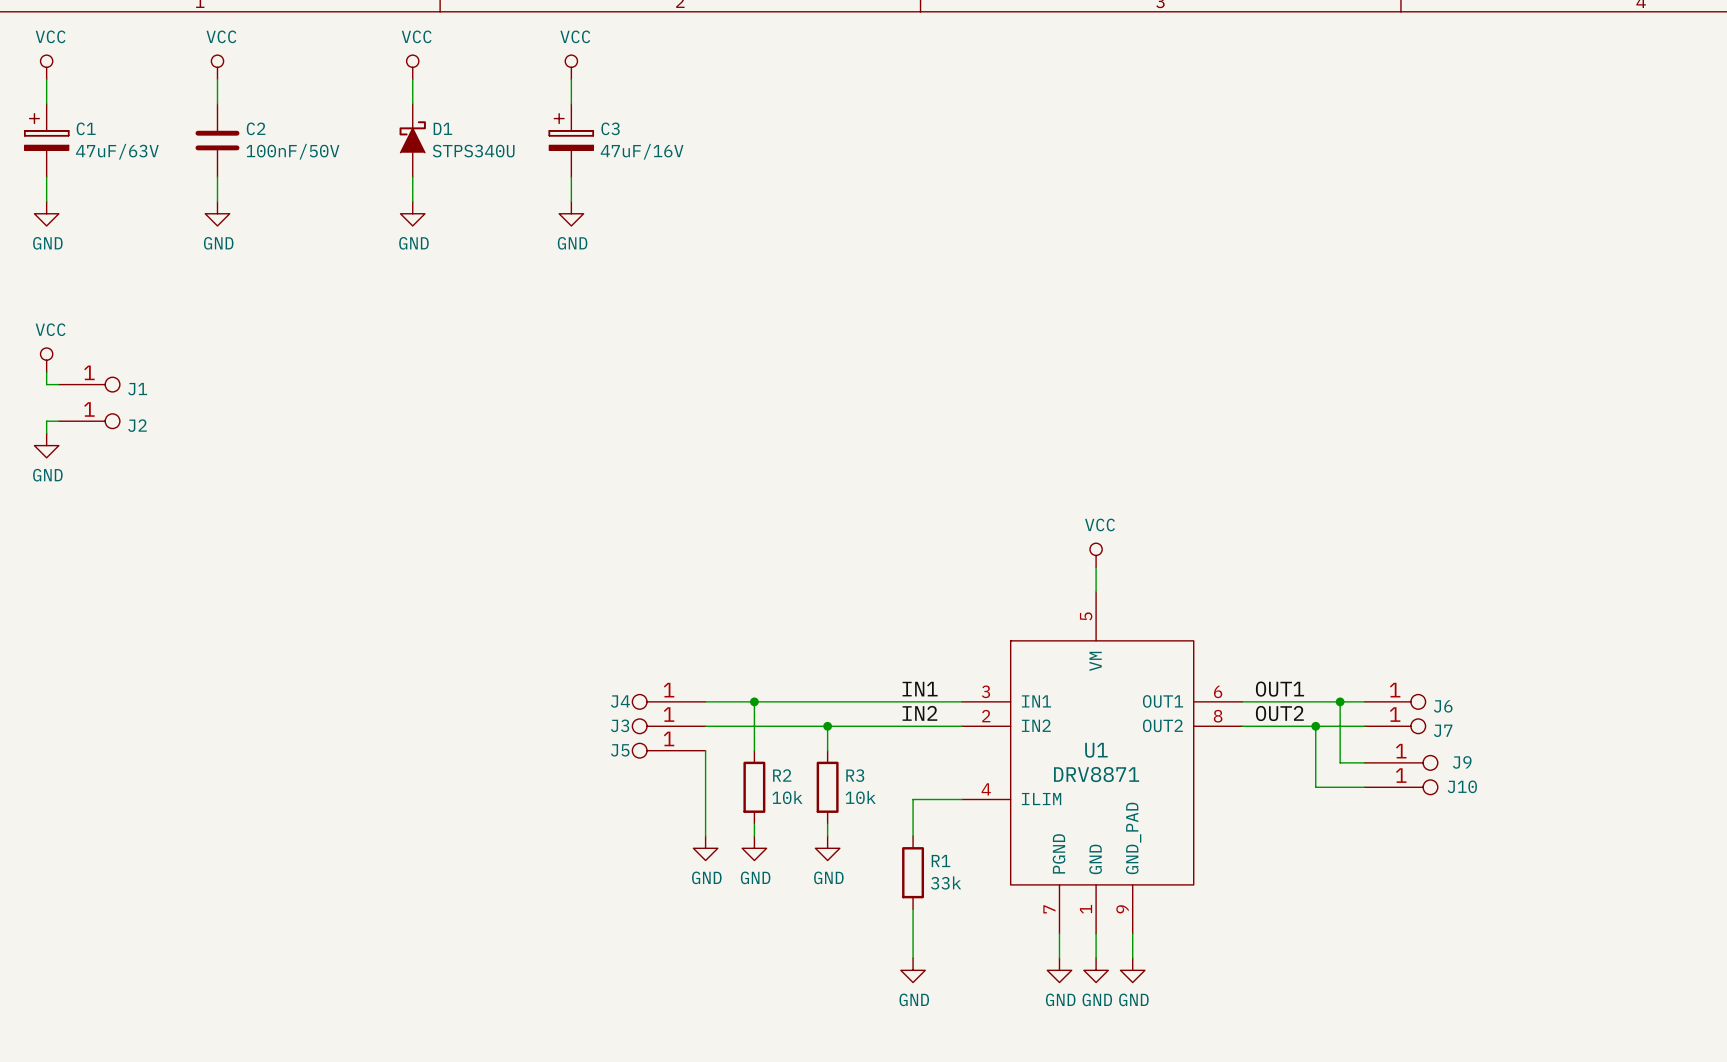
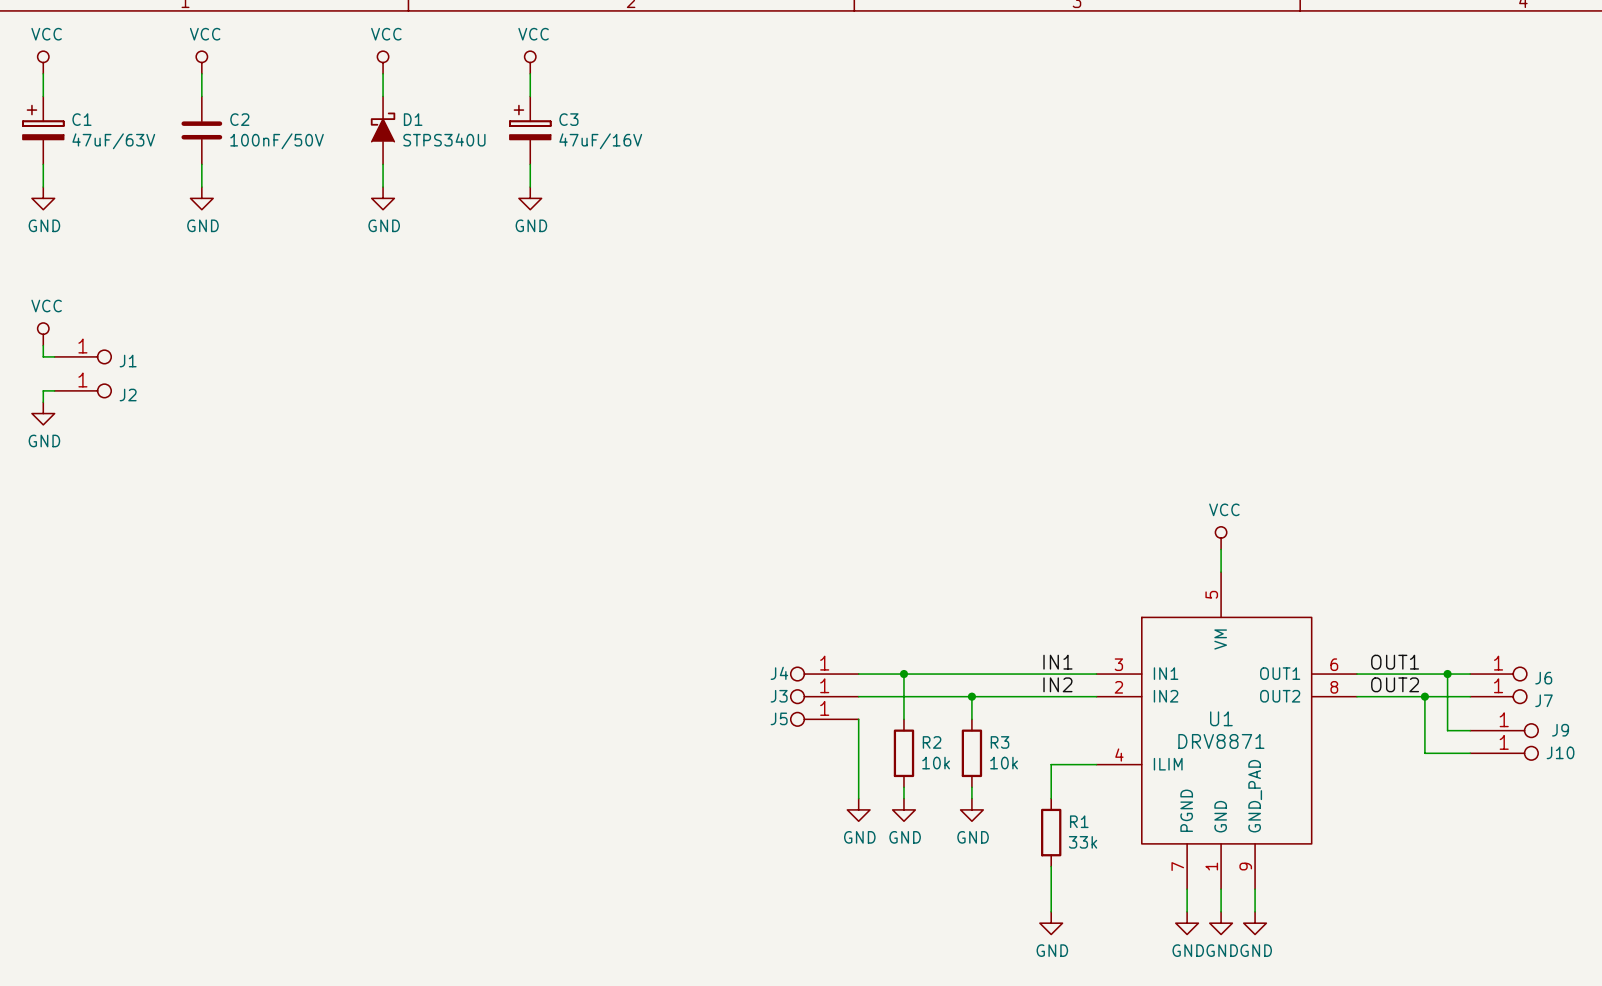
power symbol position: VCC (1096, 555) -> VCC (1221, 538)
wire: (1096, 567) (1096, 592) -> (1221, 549) (1221, 572)
label position: IN1 (920, 689) -> IN1 (1057, 662)
label position: OUT1 (1279, 689) -> OUT1 (1395, 662)
J3 position: (668, 701) -> (824, 674)
wire: (705, 701) (961, 701) -> (858, 696) (1096, 696)
wire: (754, 701) (754, 750) -> (903, 674) (903, 719)
junction: (754, 701) -> none
wire: (1242, 701) (1364, 701) -> (1356, 674) (1470, 674)
wire: (1340, 701) (1340, 762) (1364, 762) -> (1447, 674) (1447, 730) (1470, 730)
junction: (1340, 701) -> none
J6 position: (1395, 701) -> (1498, 674)
label position: IN2 (919, 713) -> IN2 (1057, 684)
label position: OUT2 (1279, 713) -> OUT2 (1395, 684)
J4 position: (668, 726) -> (824, 696)
wire: (705, 726) (925, 726) -> none
wire: (827, 726) (827, 750) -> (971, 696) (971, 719)
junction: (827, 726) -> none
wire: none -> (892, 674) (1096, 674)
junction: none -> (903, 674)
wire: (1242, 726) (1364, 726) -> (1356, 696) (1470, 696)
wire: (1315, 726) (1315, 787) (1364, 787) -> (1424, 696) (1424, 753) (1470, 753)
junction: (1315, 726) -> none
J7 position: (1395, 726) -> (1498, 696)
junction: none -> (1447, 674)
J5 position: (668, 750) -> (824, 719)
wire: (705, 750) (705, 836) -> (858, 719) (858, 798)
junction: none -> (971, 696)
junction: none -> (1424, 696)
U1 position: (1102, 762) -> (1226, 730)
J9 position: (1401, 762) -> (1504, 730)
R2 position: (754, 787) -> (903, 753)
R3 position: (827, 787) -> (971, 753)
J10 position: (1401, 787) -> (1504, 753)
wire: (961, 799) (913, 799) (913, 836) -> (1096, 764) (1051, 764) (1051, 798)
wire: (754, 823) (754, 836) -> (903, 787) (903, 798)
wire: (827, 823) (827, 836) -> (971, 787) (971, 798)
power symbol: GND (705, 848) -> none
power symbol: GND (754, 848) -> none
power symbol: GND (827, 848) -> none
R1 position: (913, 872) -> (1051, 832)
power symbol: none -> GND (858, 809)
power symbol: none -> GND (903, 809)
power symbol: none -> GND (971, 809)
wire: (913, 909) (913, 958) -> none
wire: (1059, 933) (1059, 958) -> (1187, 889) (1187, 911)
wire: (1096, 933) (1096, 958) -> (1221, 889) (1221, 911)
wire: none -> (1255, 889) (1255, 911)
power symbol: GND (913, 970) -> none
power symbol: GND (1059, 970) -> none
power symbol: GND (1096, 970) -> none
power symbol: GND (1132, 970) -> none
power symbol: none -> GND (1051, 923)
power symbol: none -> GND (1187, 923)
power symbol: none -> GND (1221, 923)
power symbol: none -> GND (1255, 923)

